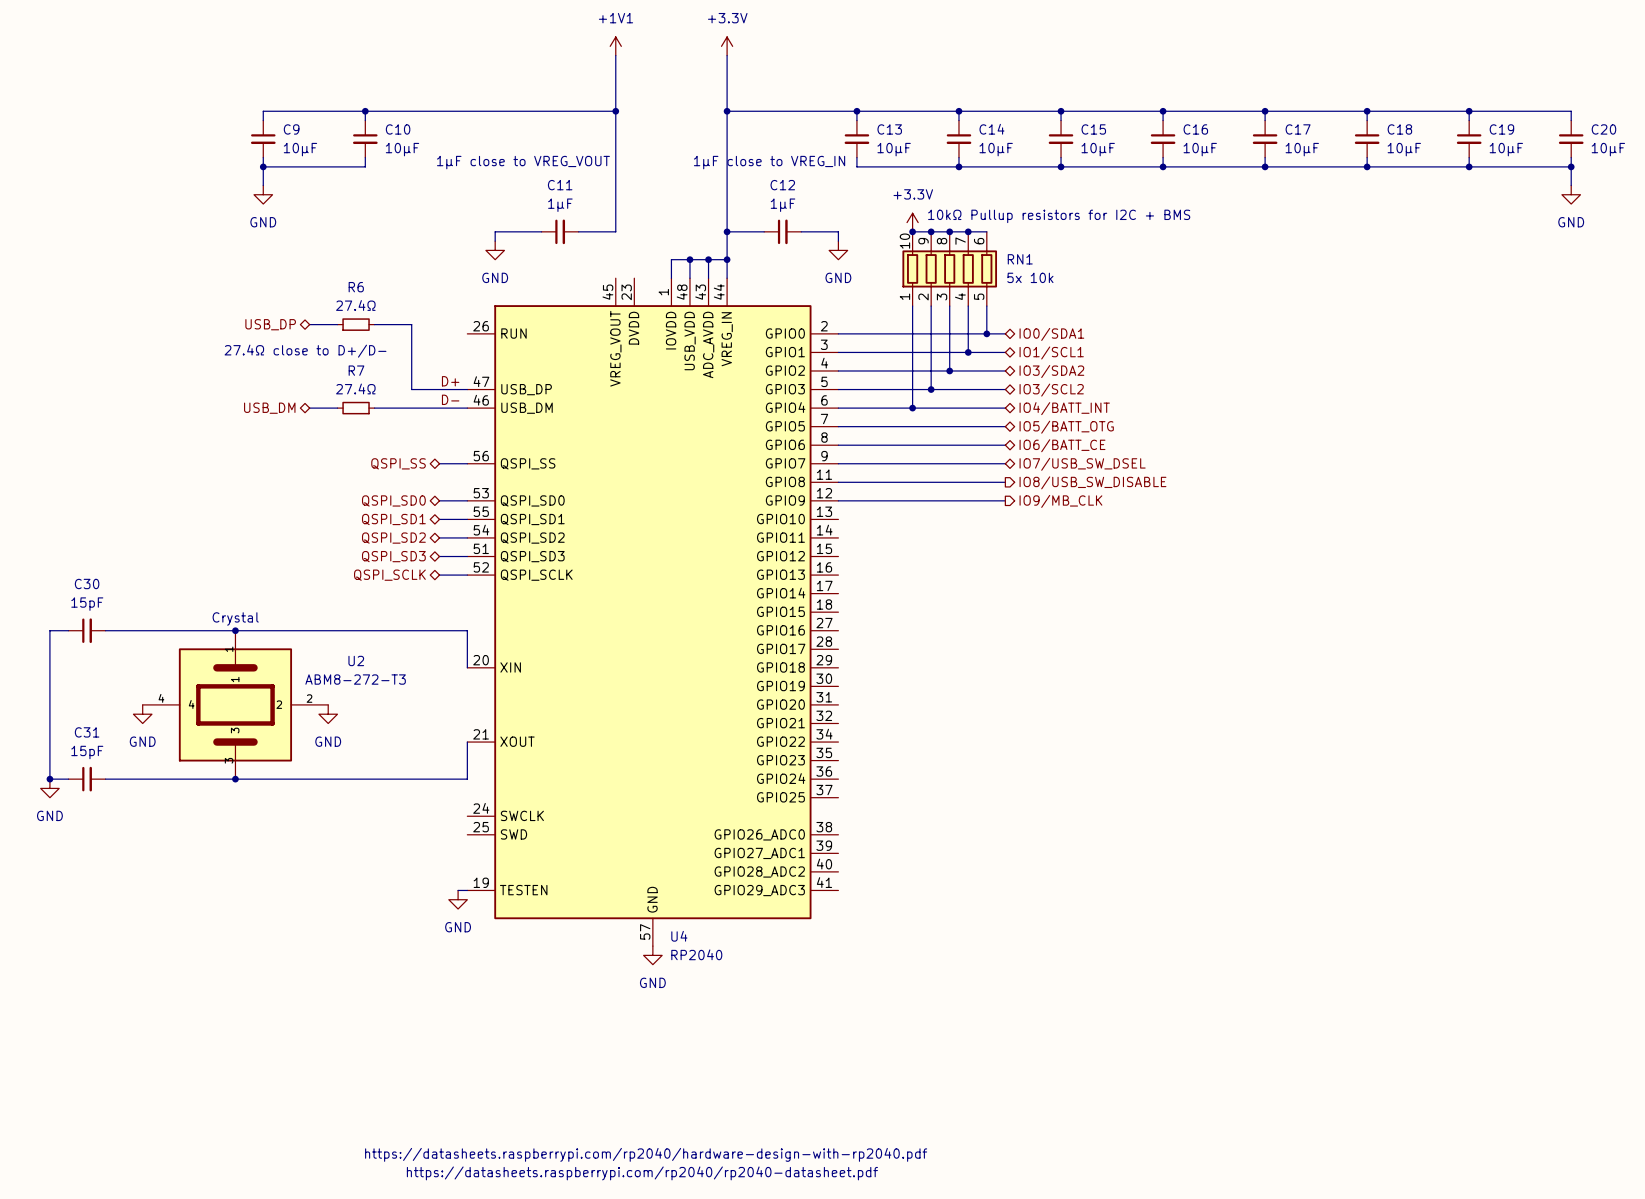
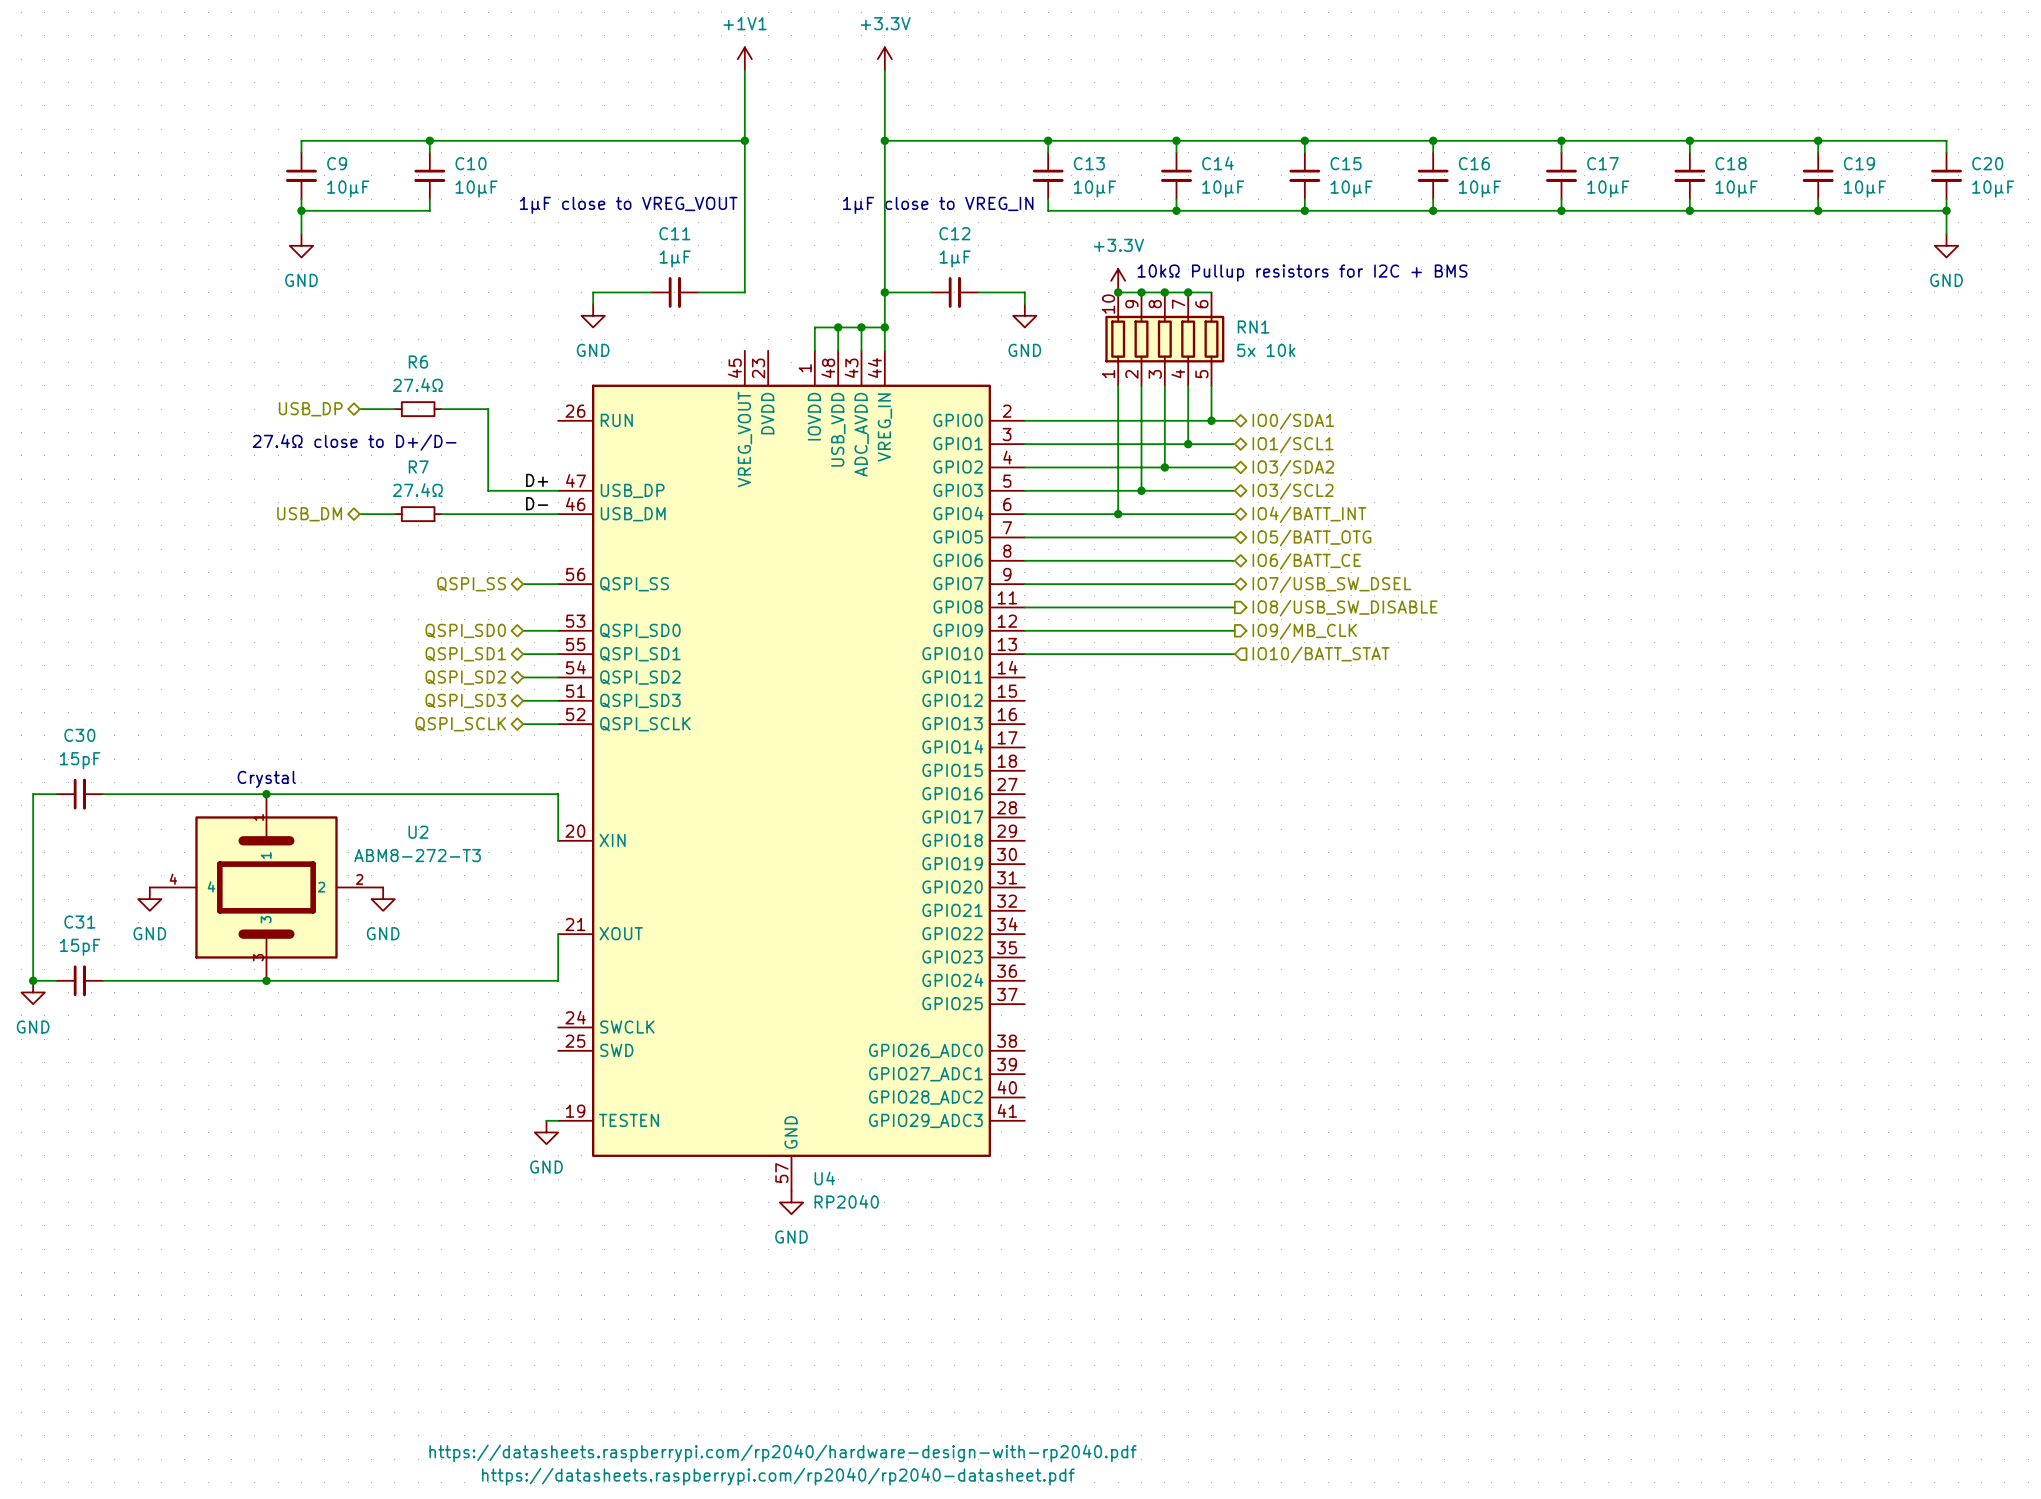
wire: none -> (1024, 654) (1234, 654)
hierarchical label: none -> IO10/BATT_STAT (1321, 654)

